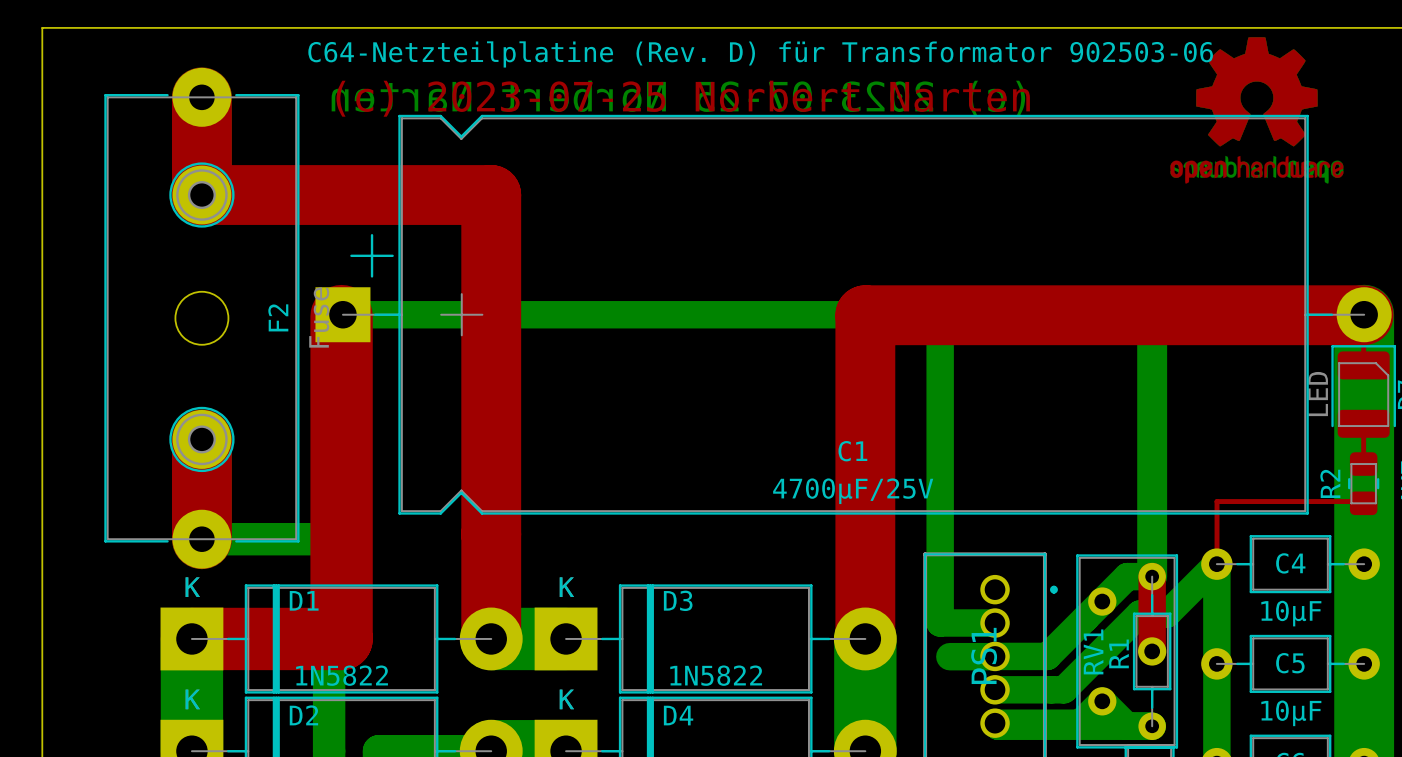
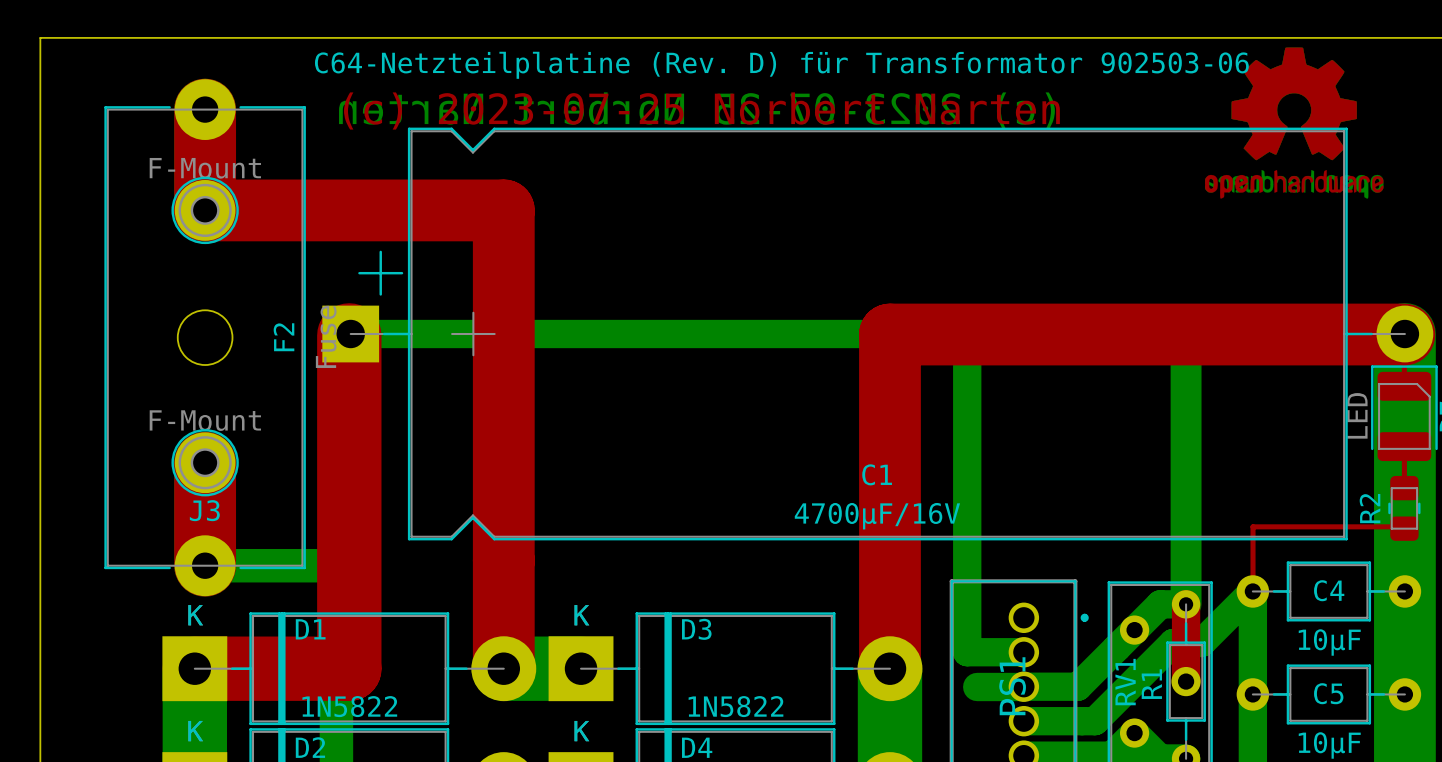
part value: none -> F-Mount (205, 168)
J3 value: none -> F-Mount (205, 420)
J3 name: none -> J3 (204, 510)
C1 value: 4700µF/25V (853, 491) -> 4700µF/16V (877, 516)

